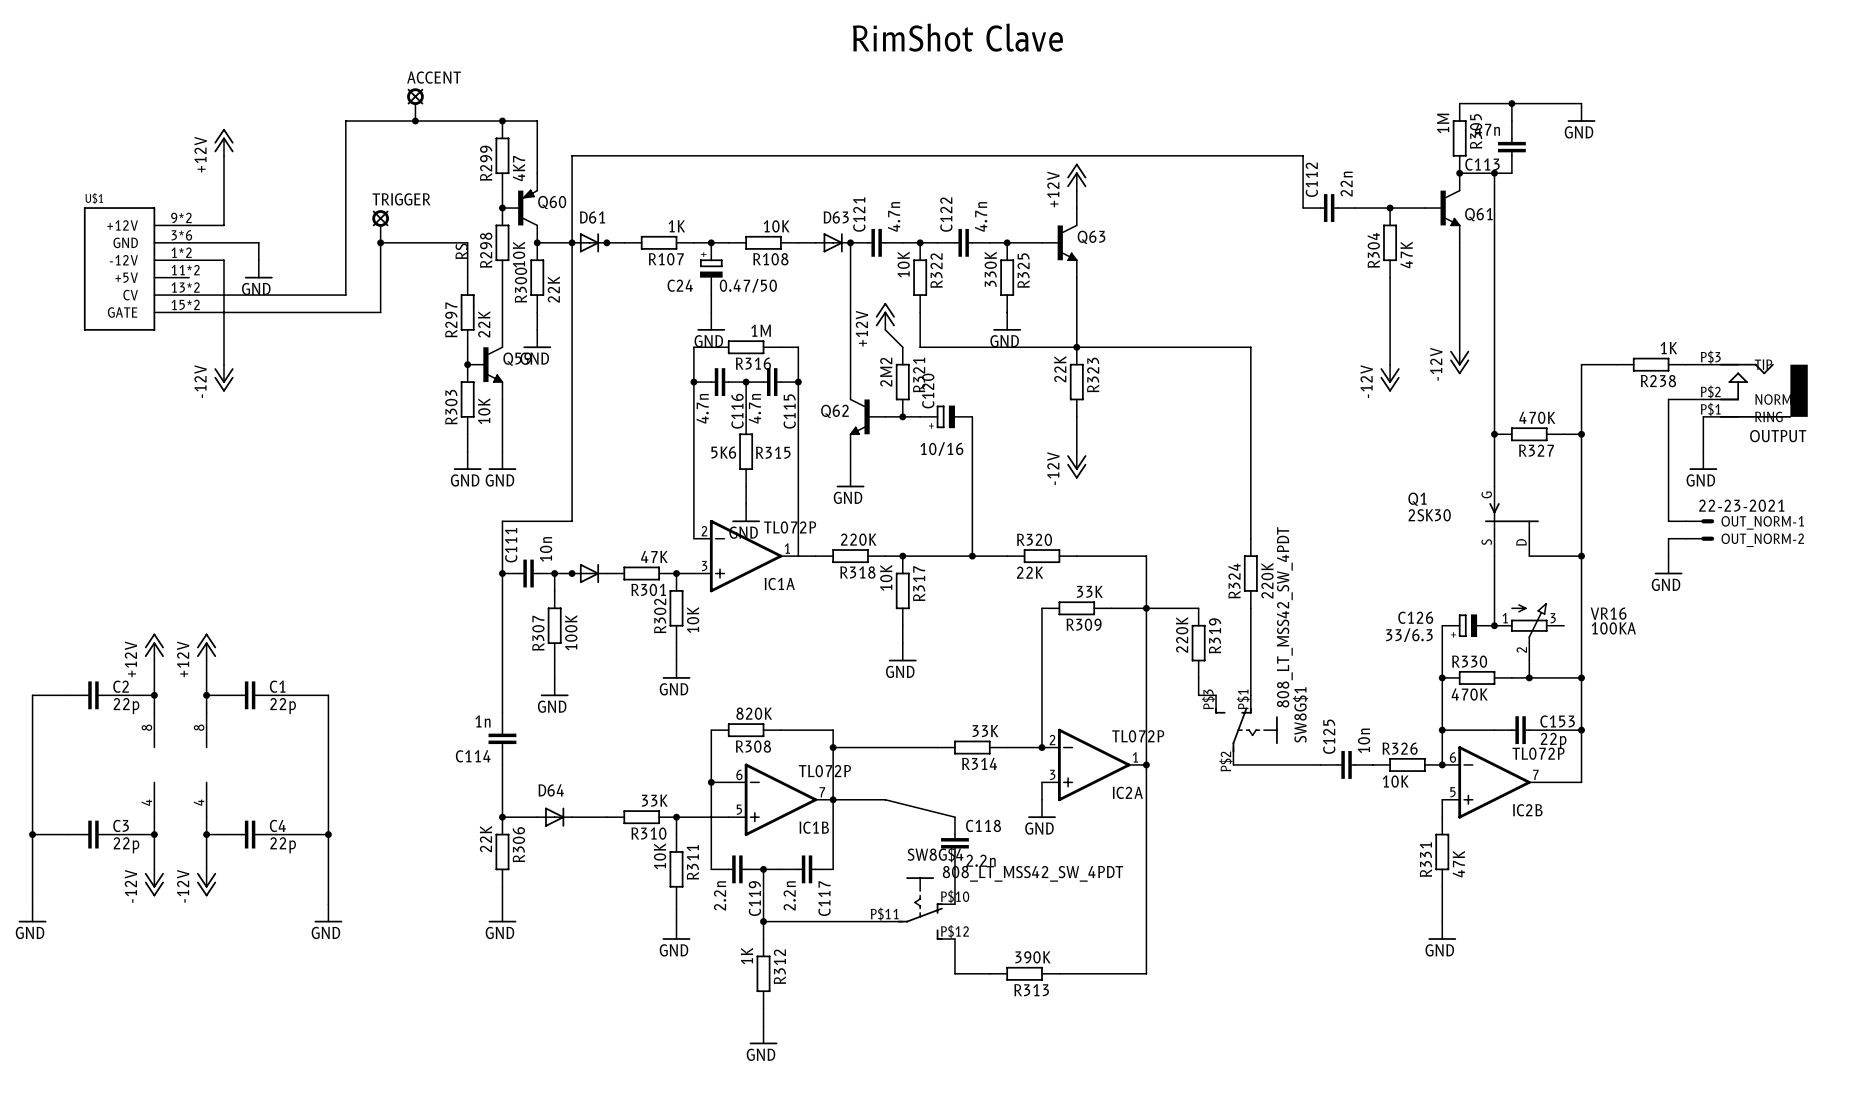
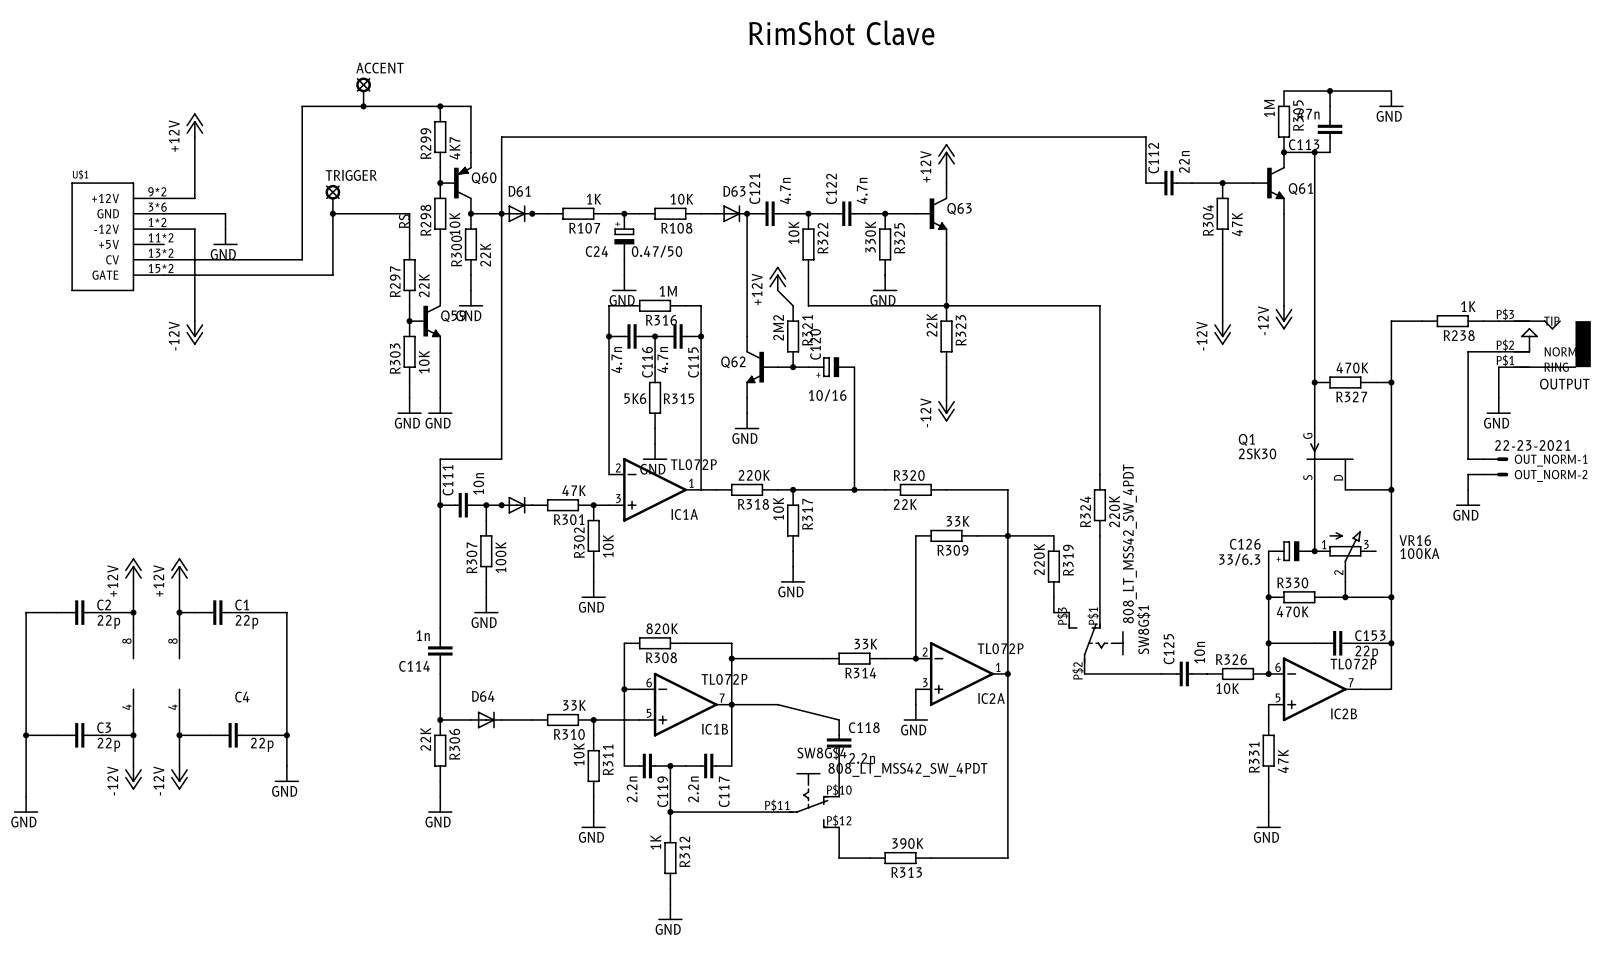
C4 name position: C4 (277, 825) -> C4 (242, 697)
C4 position: (250, 834) -> (233, 735)
power symbol position: GND (328, 913) -> GND (286, 774)

